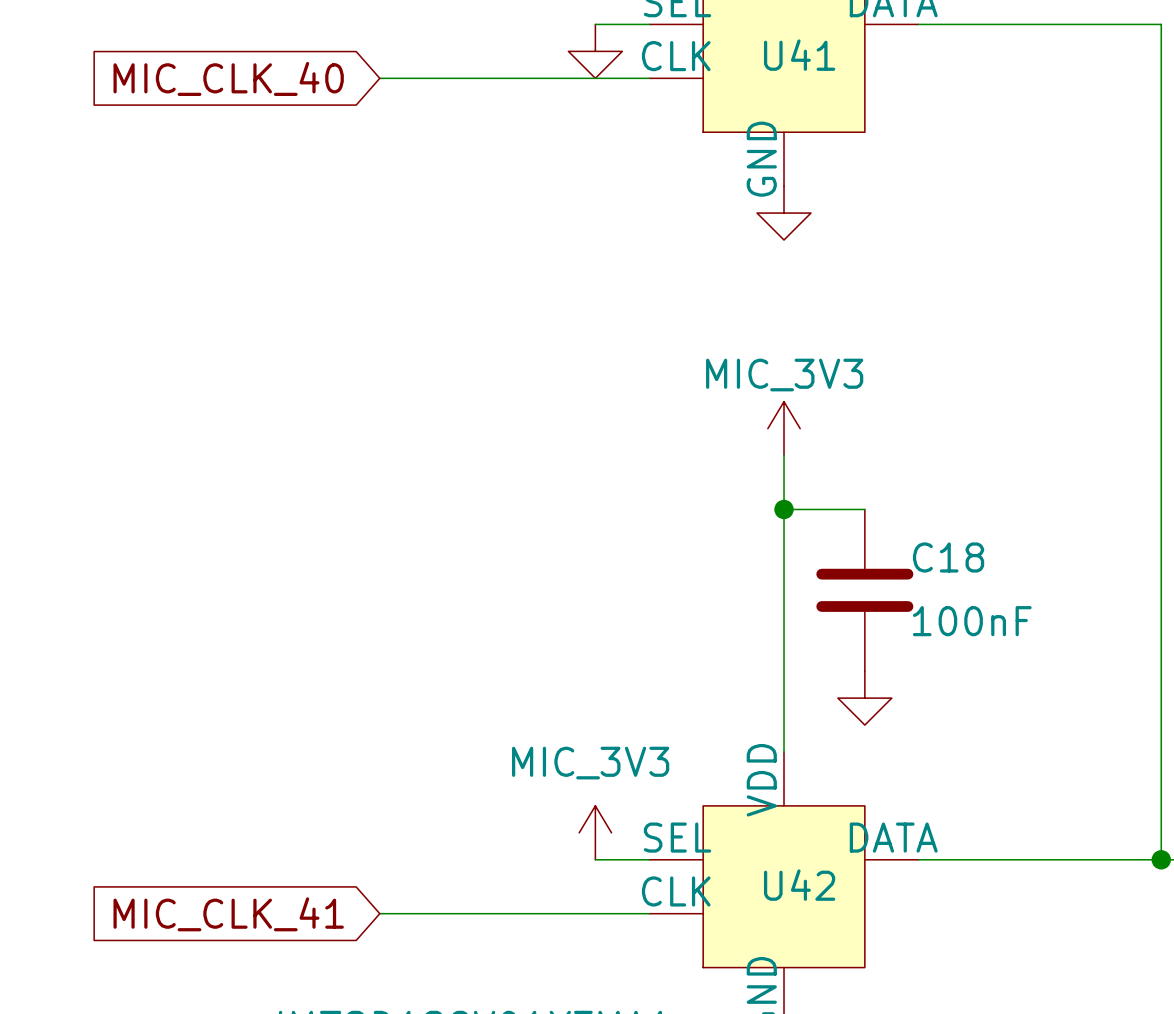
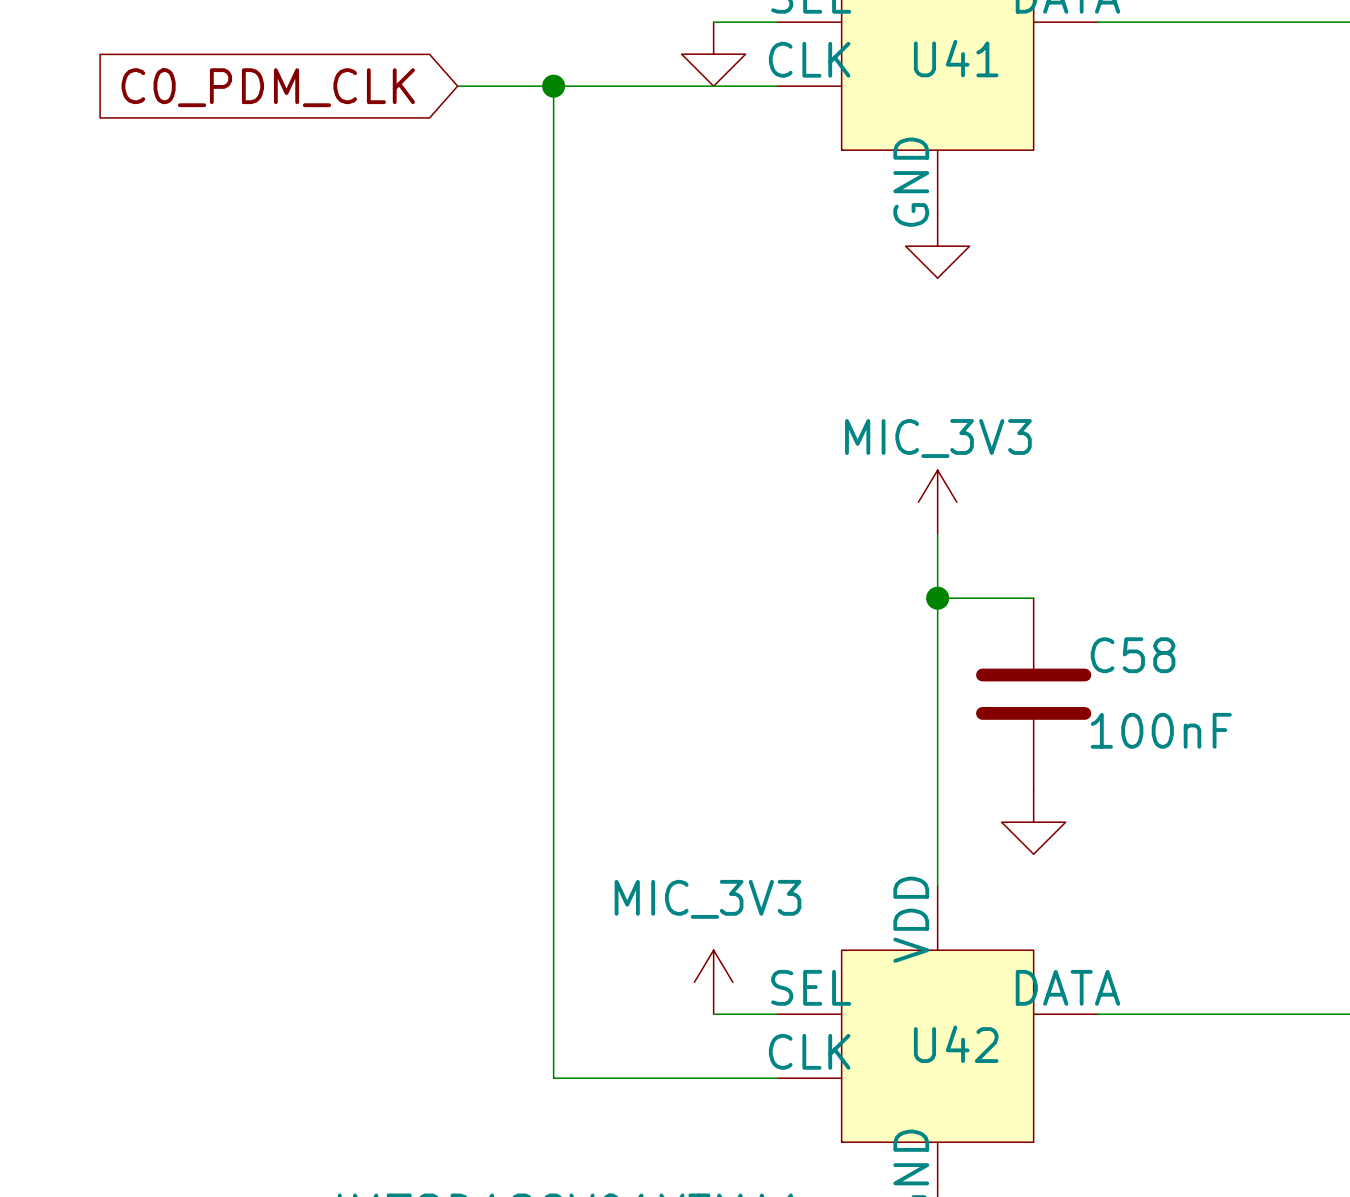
global label: MIC_CLK_40 (228, 78) -> C0_PDM_CLK (268, 87)
junction: none -> (553, 86)
C18 name: C18 (948, 557) -> C58 (1133, 655)
wire: (379, 913) (460, 913) -> (553, 86) (553, 1078)
global label: MIC_CLK_41 (228, 914) -> none

